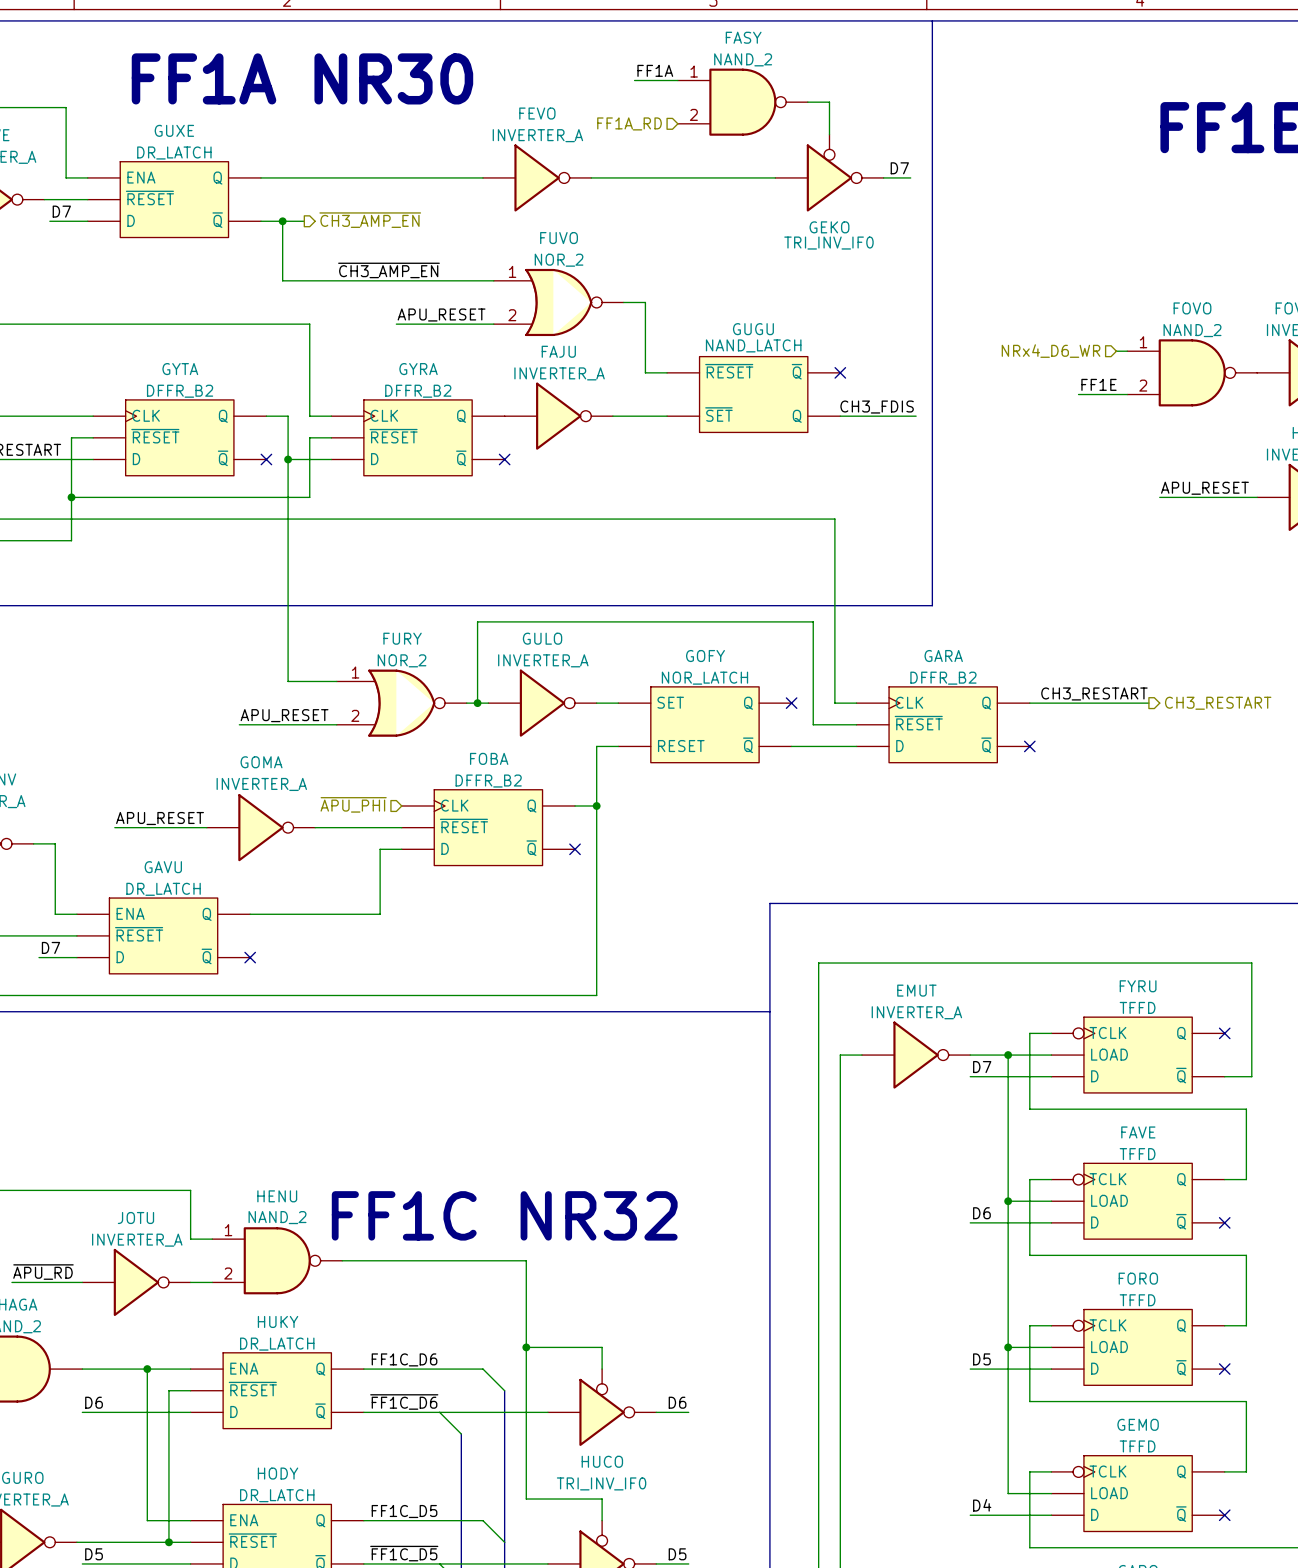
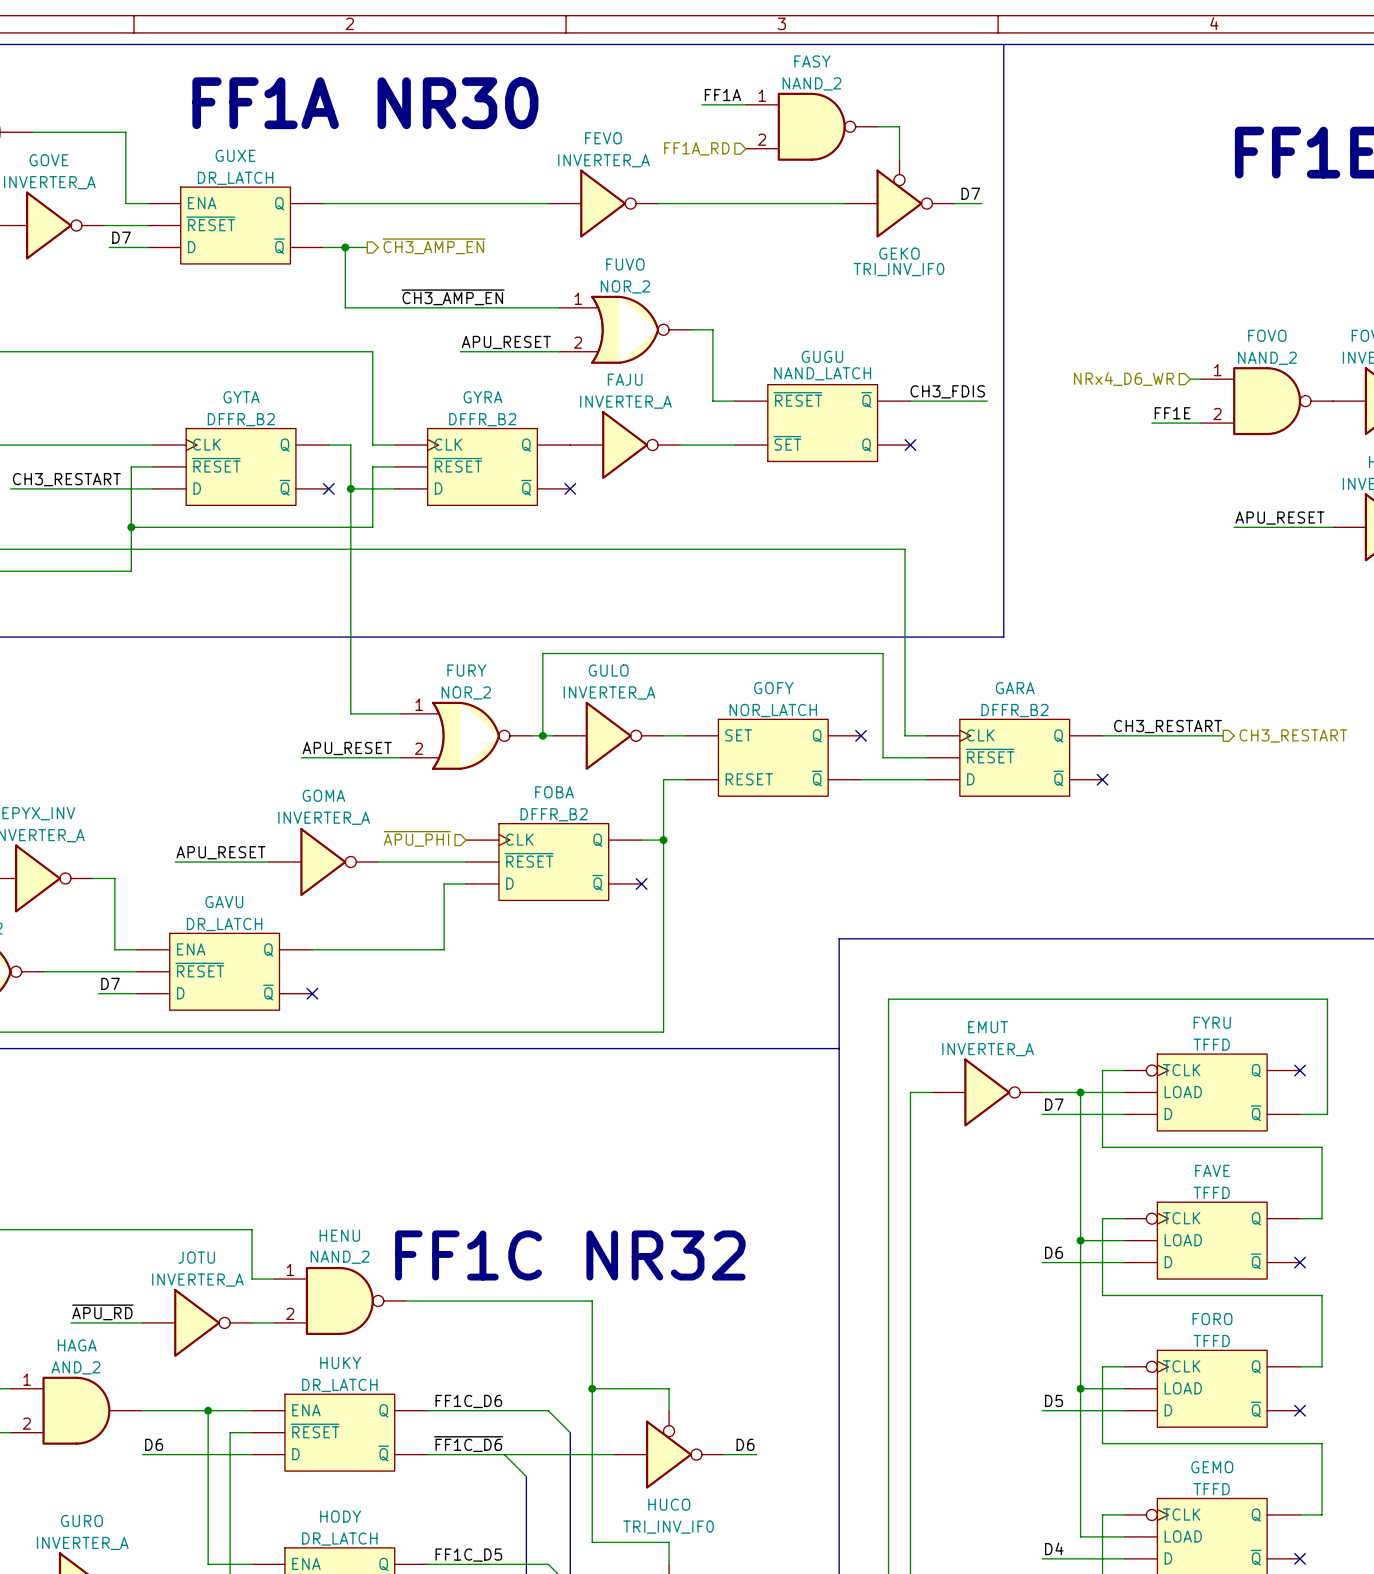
no-connect mark position: (840, 372) -> (910, 445)
label position: CH3_FDIS (877, 407) -> CH3_FDIS (947, 391)
wire: (840, 416) (916, 416) -> (910, 401) (987, 401)

